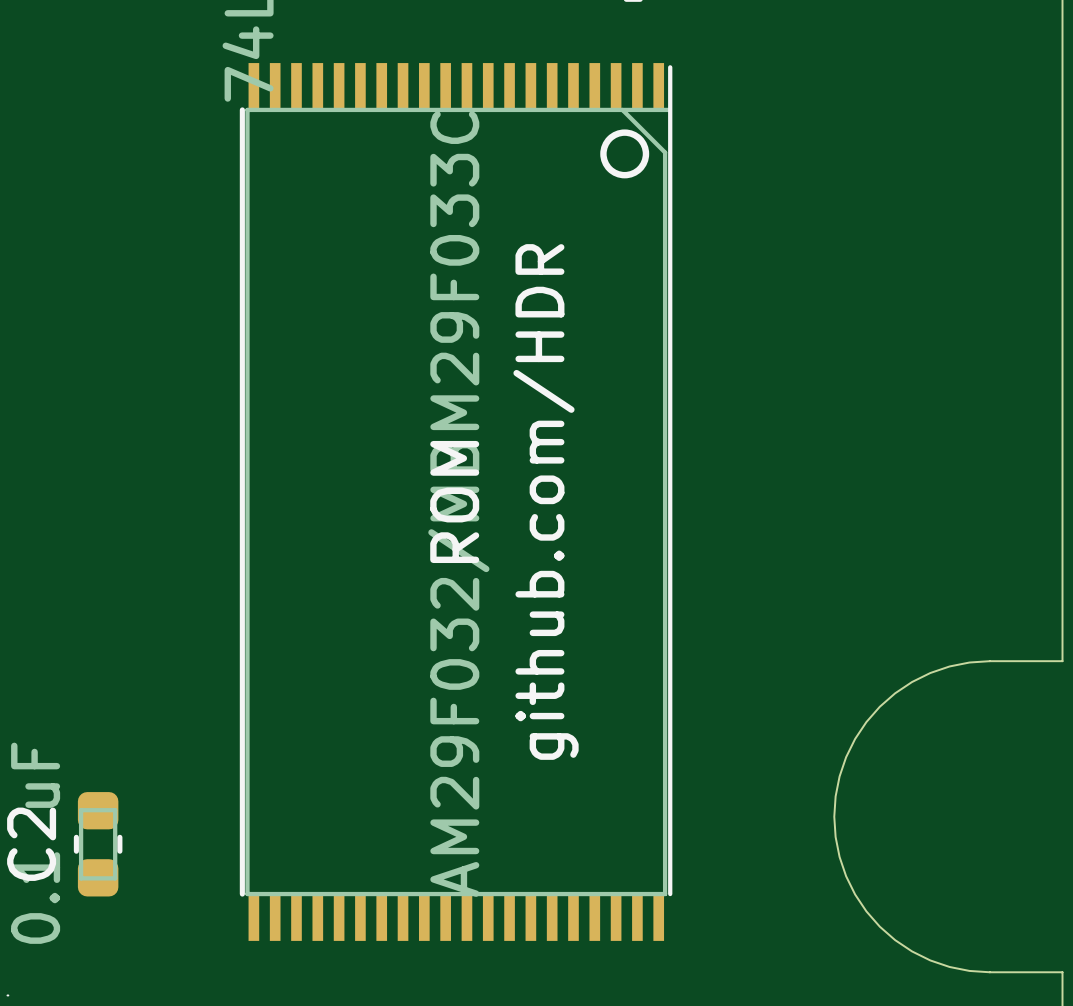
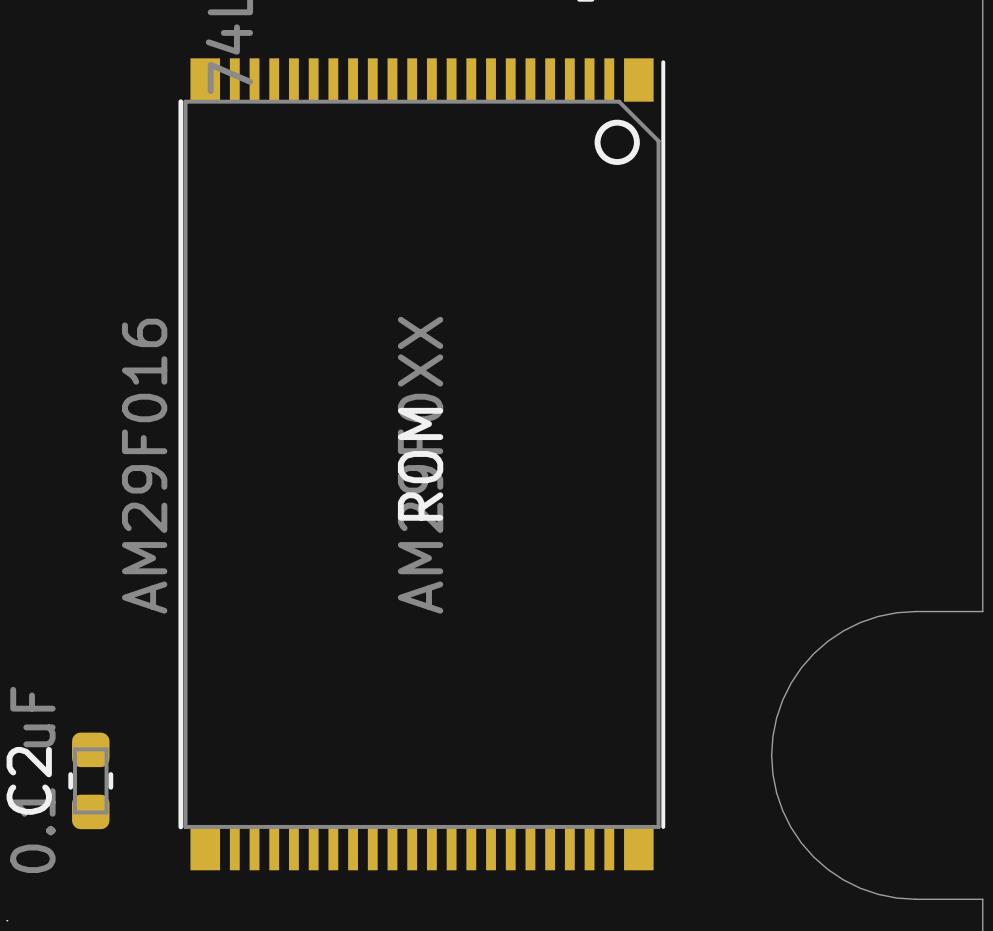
ROM footprint: [239, 63, 673, 941] -> [178, 58, 666, 871]
drawing position: (624, 153) -> (617, 142)
text: github.com/HDR (546, 501) -> none
ROM value: AM29F032/MBM29F033C (458, 504) -> AM29F016 (144, 466)

